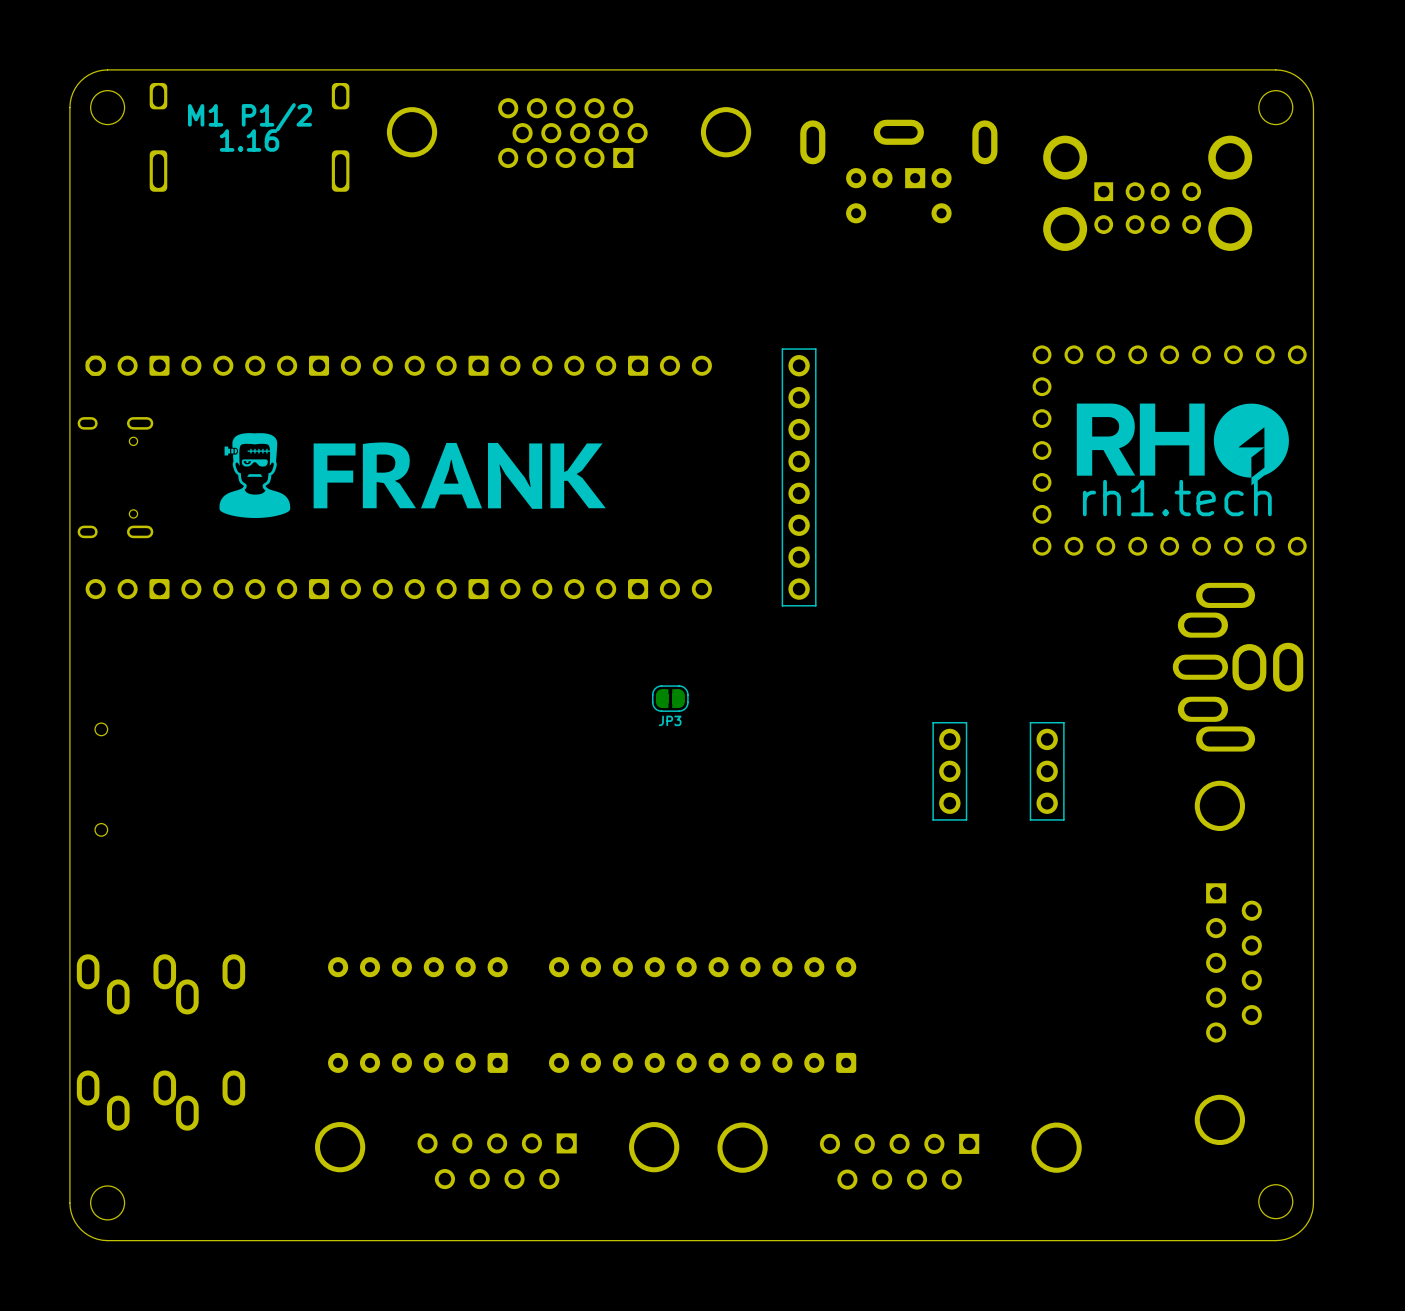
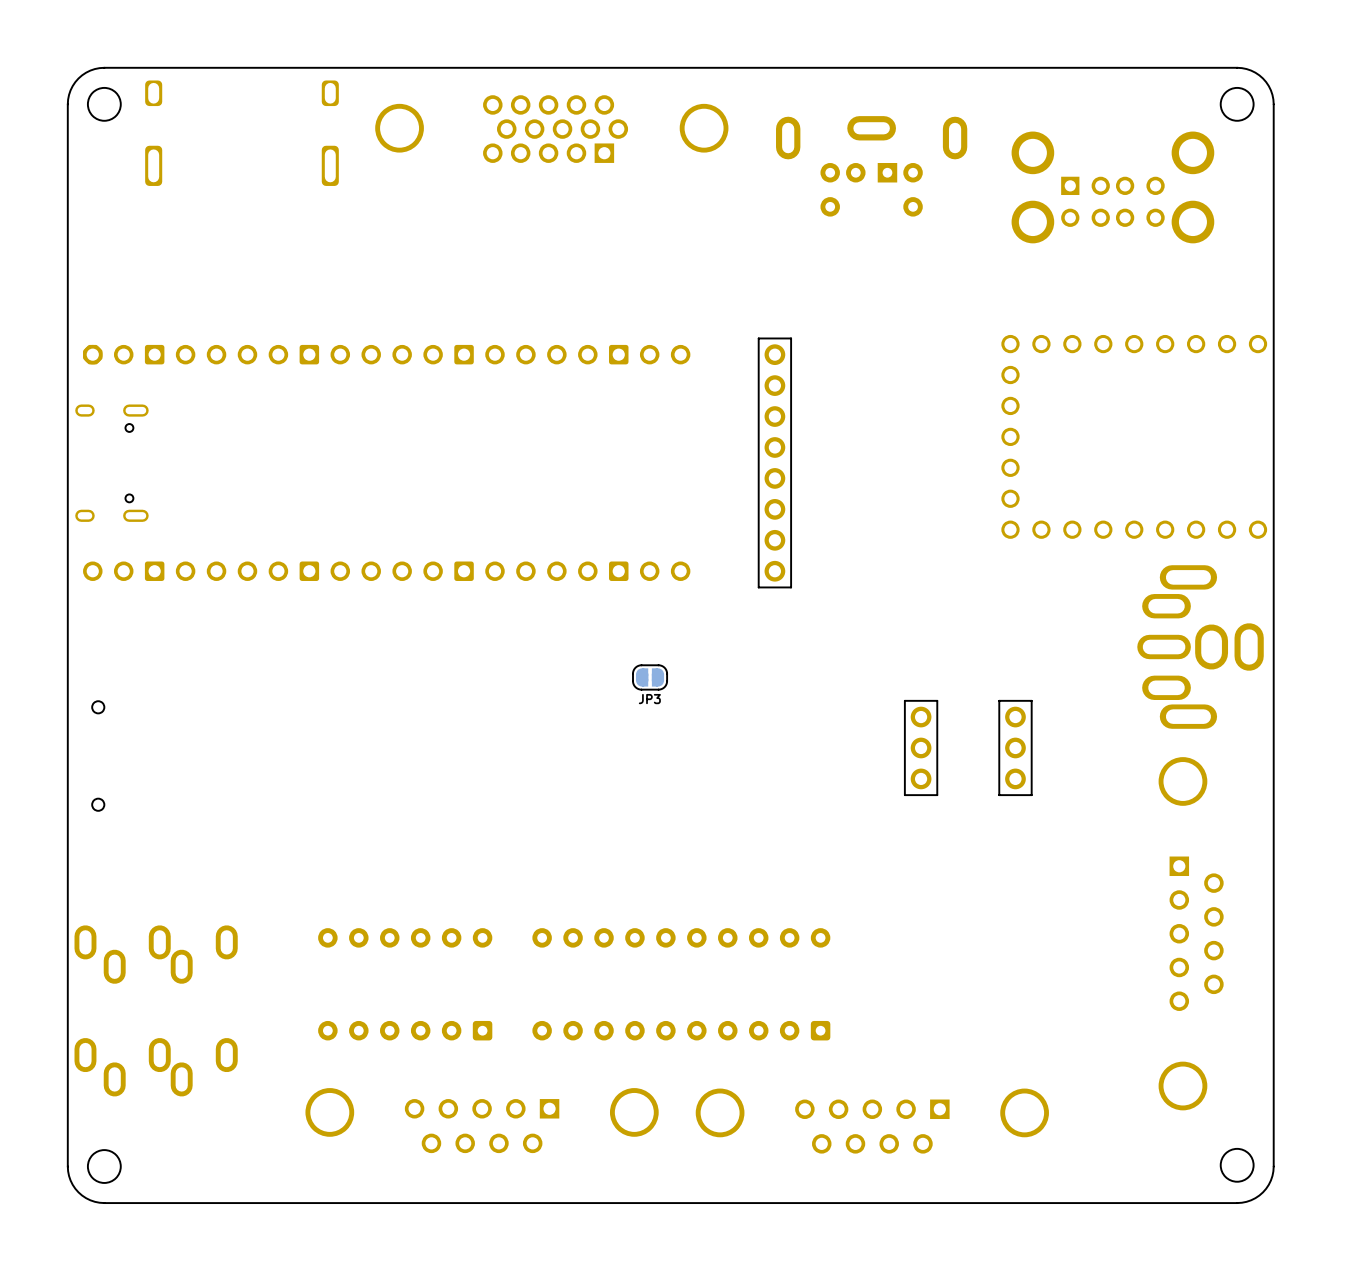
text: M1 P1/2 (249, 117) -> none
text: 1.16 (249, 140) -> none
drawing: [1076, 403, 1289, 486] -> none
drawing: [219, 433, 291, 519] -> none
drawing: [313, 442, 606, 509] -> none
text: rh1.tech (1177, 498) -> none

